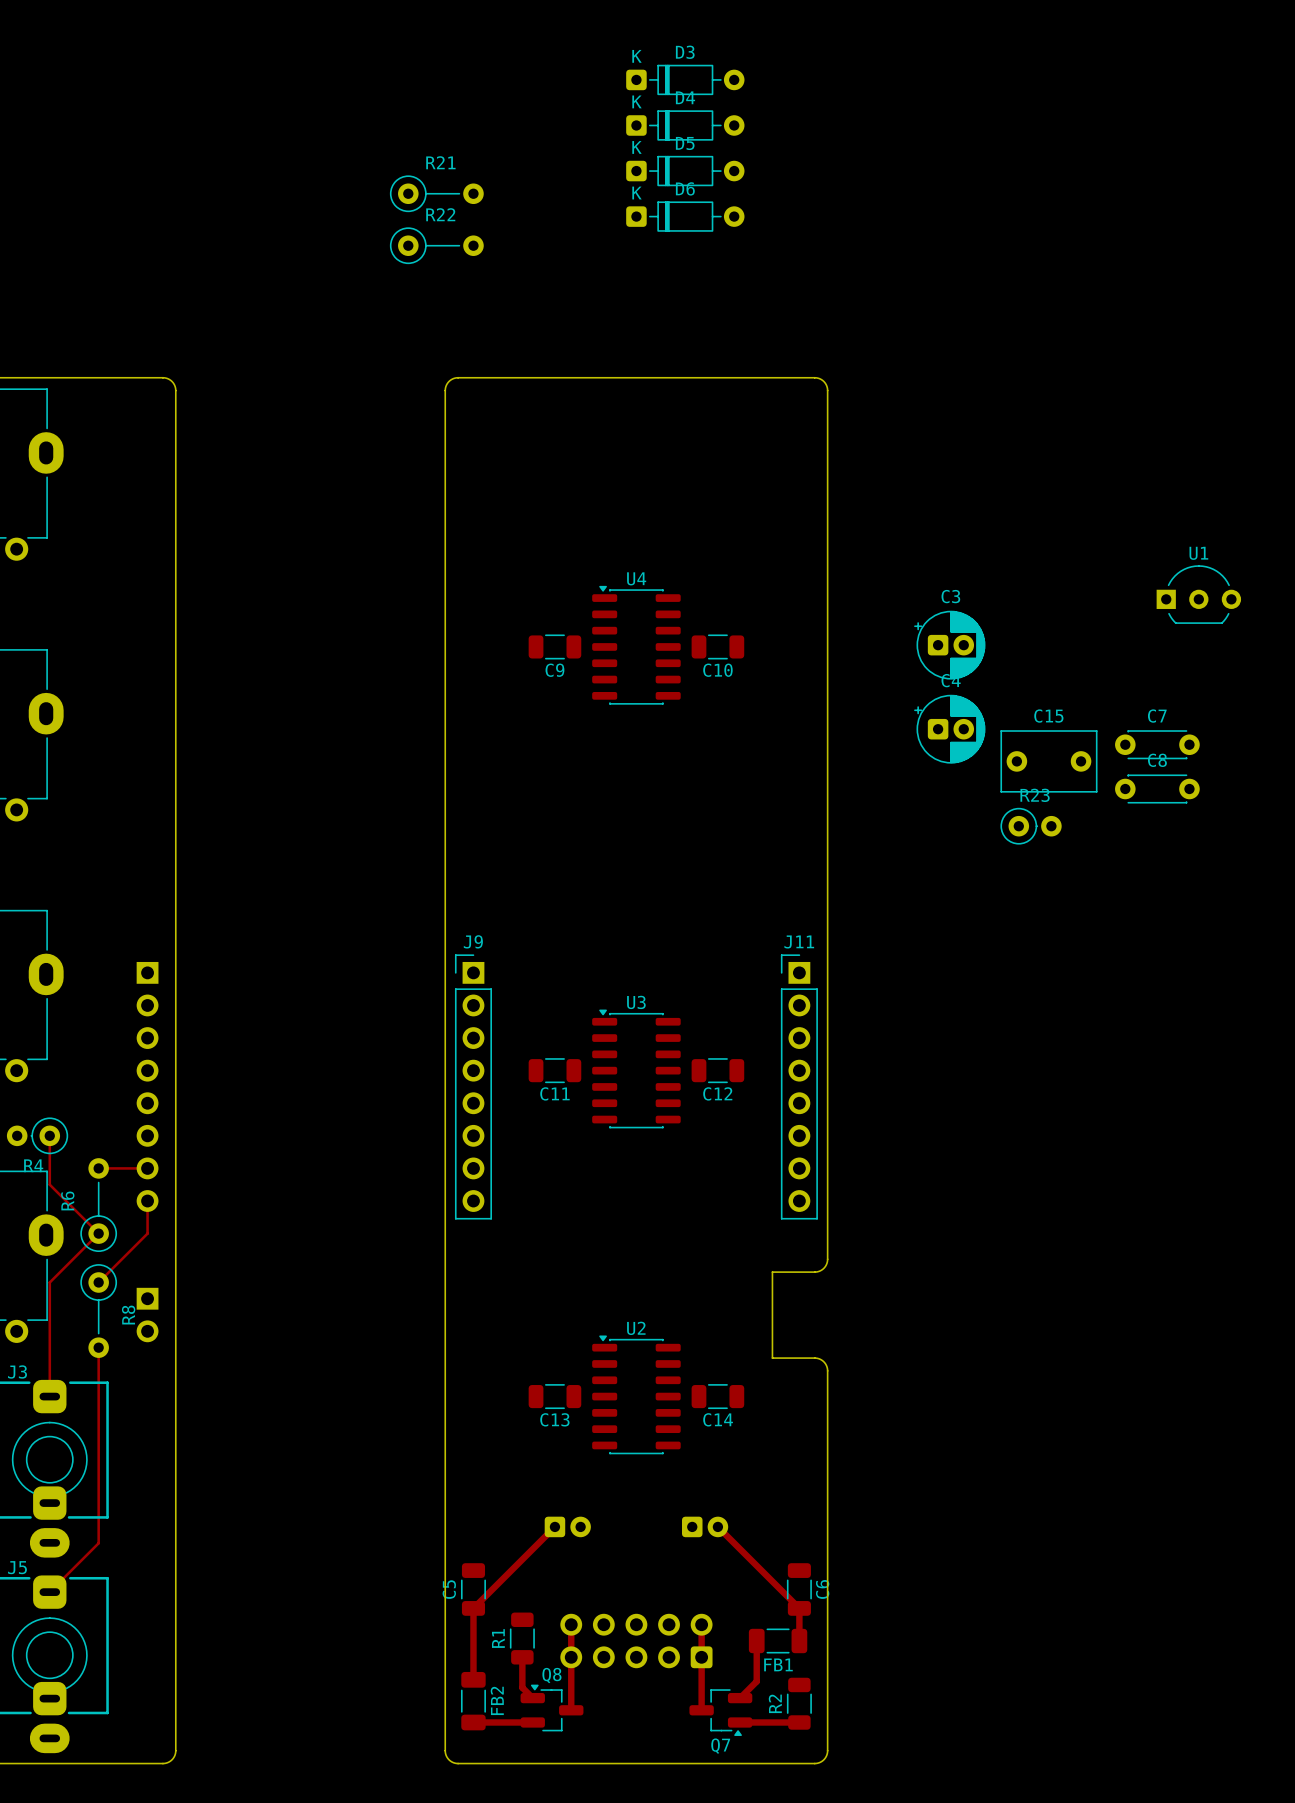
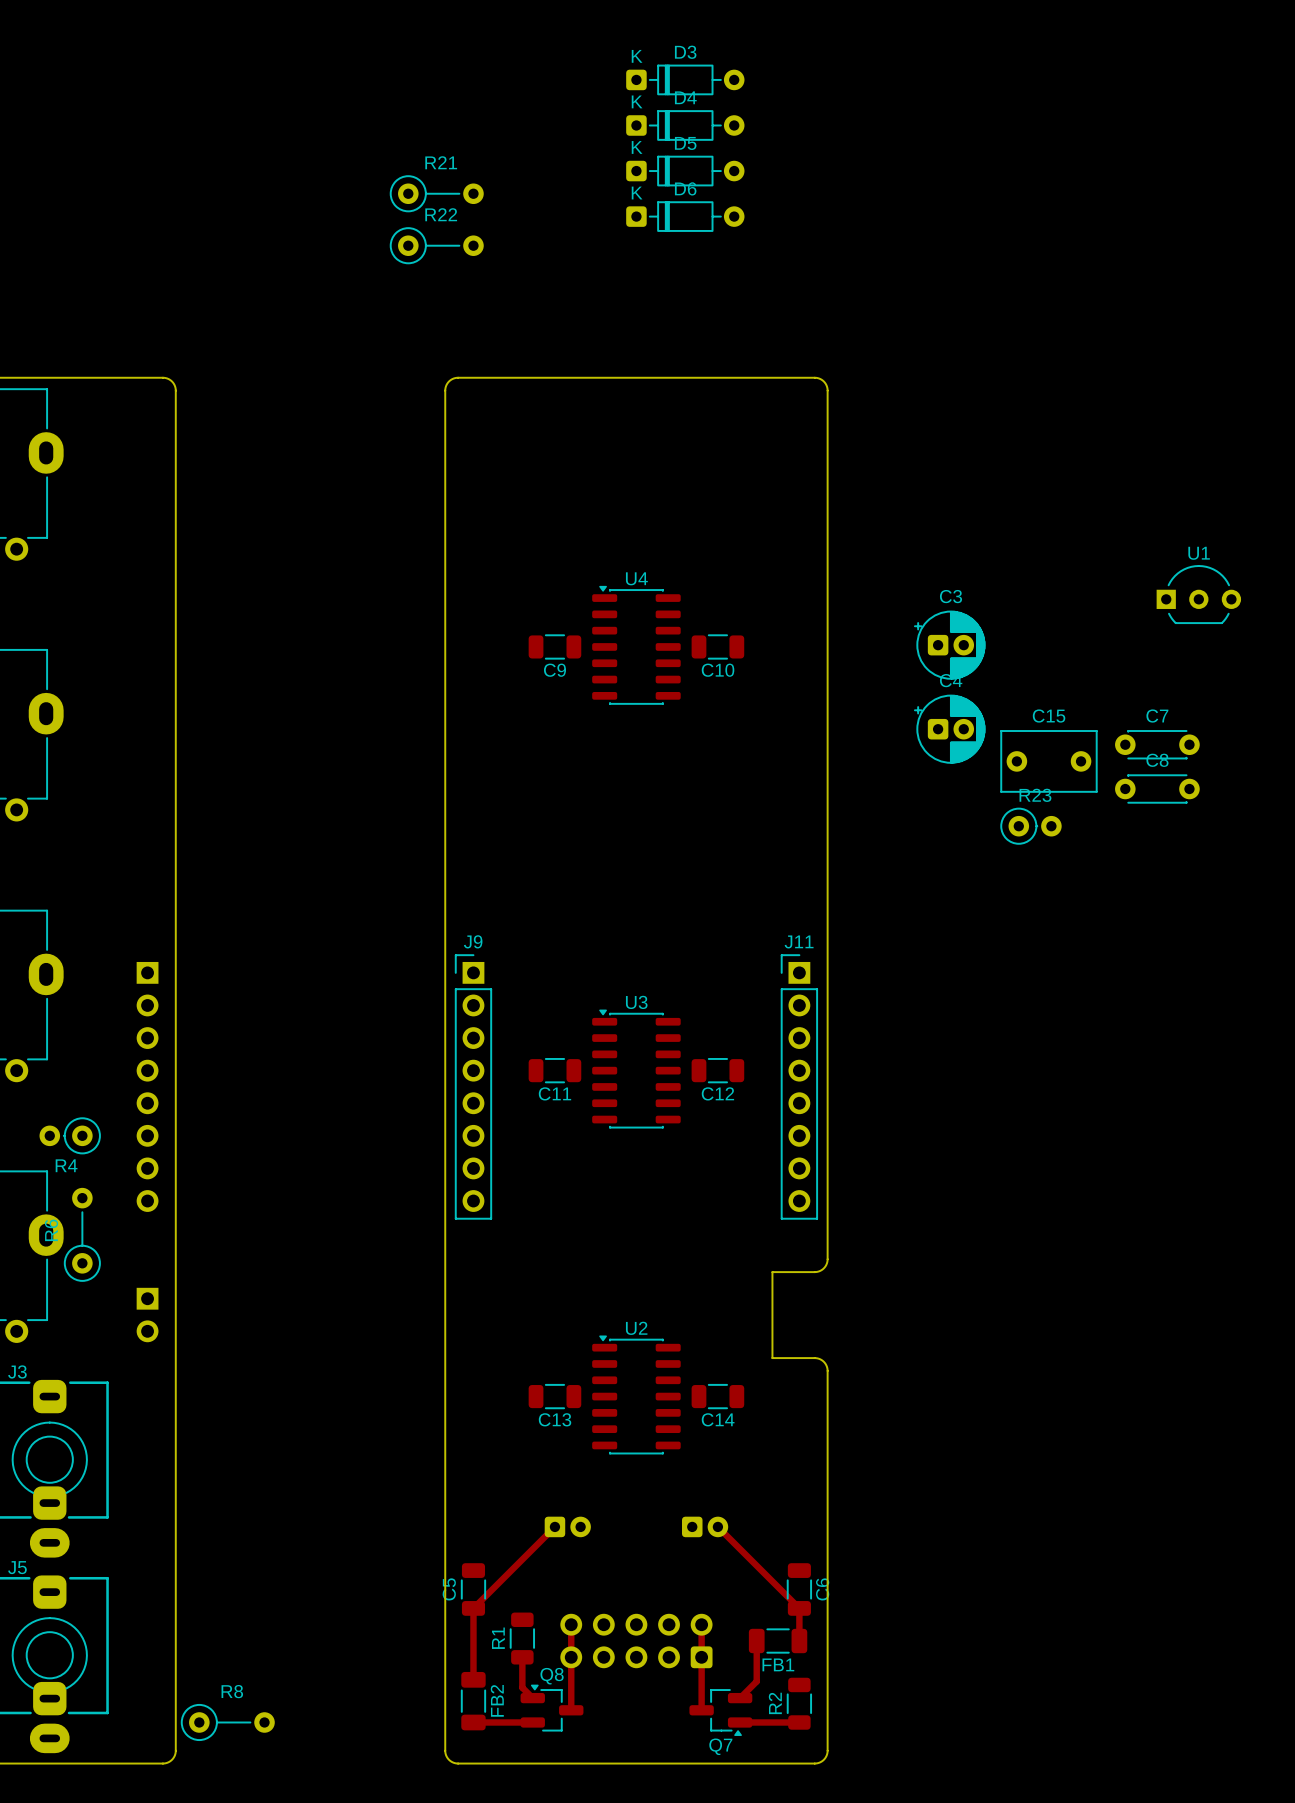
R4 position: (37, 1135) -> (70, 1135)
track: (49, 1135) (49, 1184) (98, 1233) (49, 1282) (49, 1396) -> none
track: (98, 1168) (147, 1168) -> none
track: (147, 1201) (147, 1233) (98, 1282) -> none
R6 position: (98, 1205) -> (82, 1234)
R8 rotation: 0° (98, 1311) -> 90° counterclockwise (227, 1722)
R8 position: (98, 1311) -> (227, 1722)
track: (98, 1347) (98, 1543) (49, 1592) -> none

